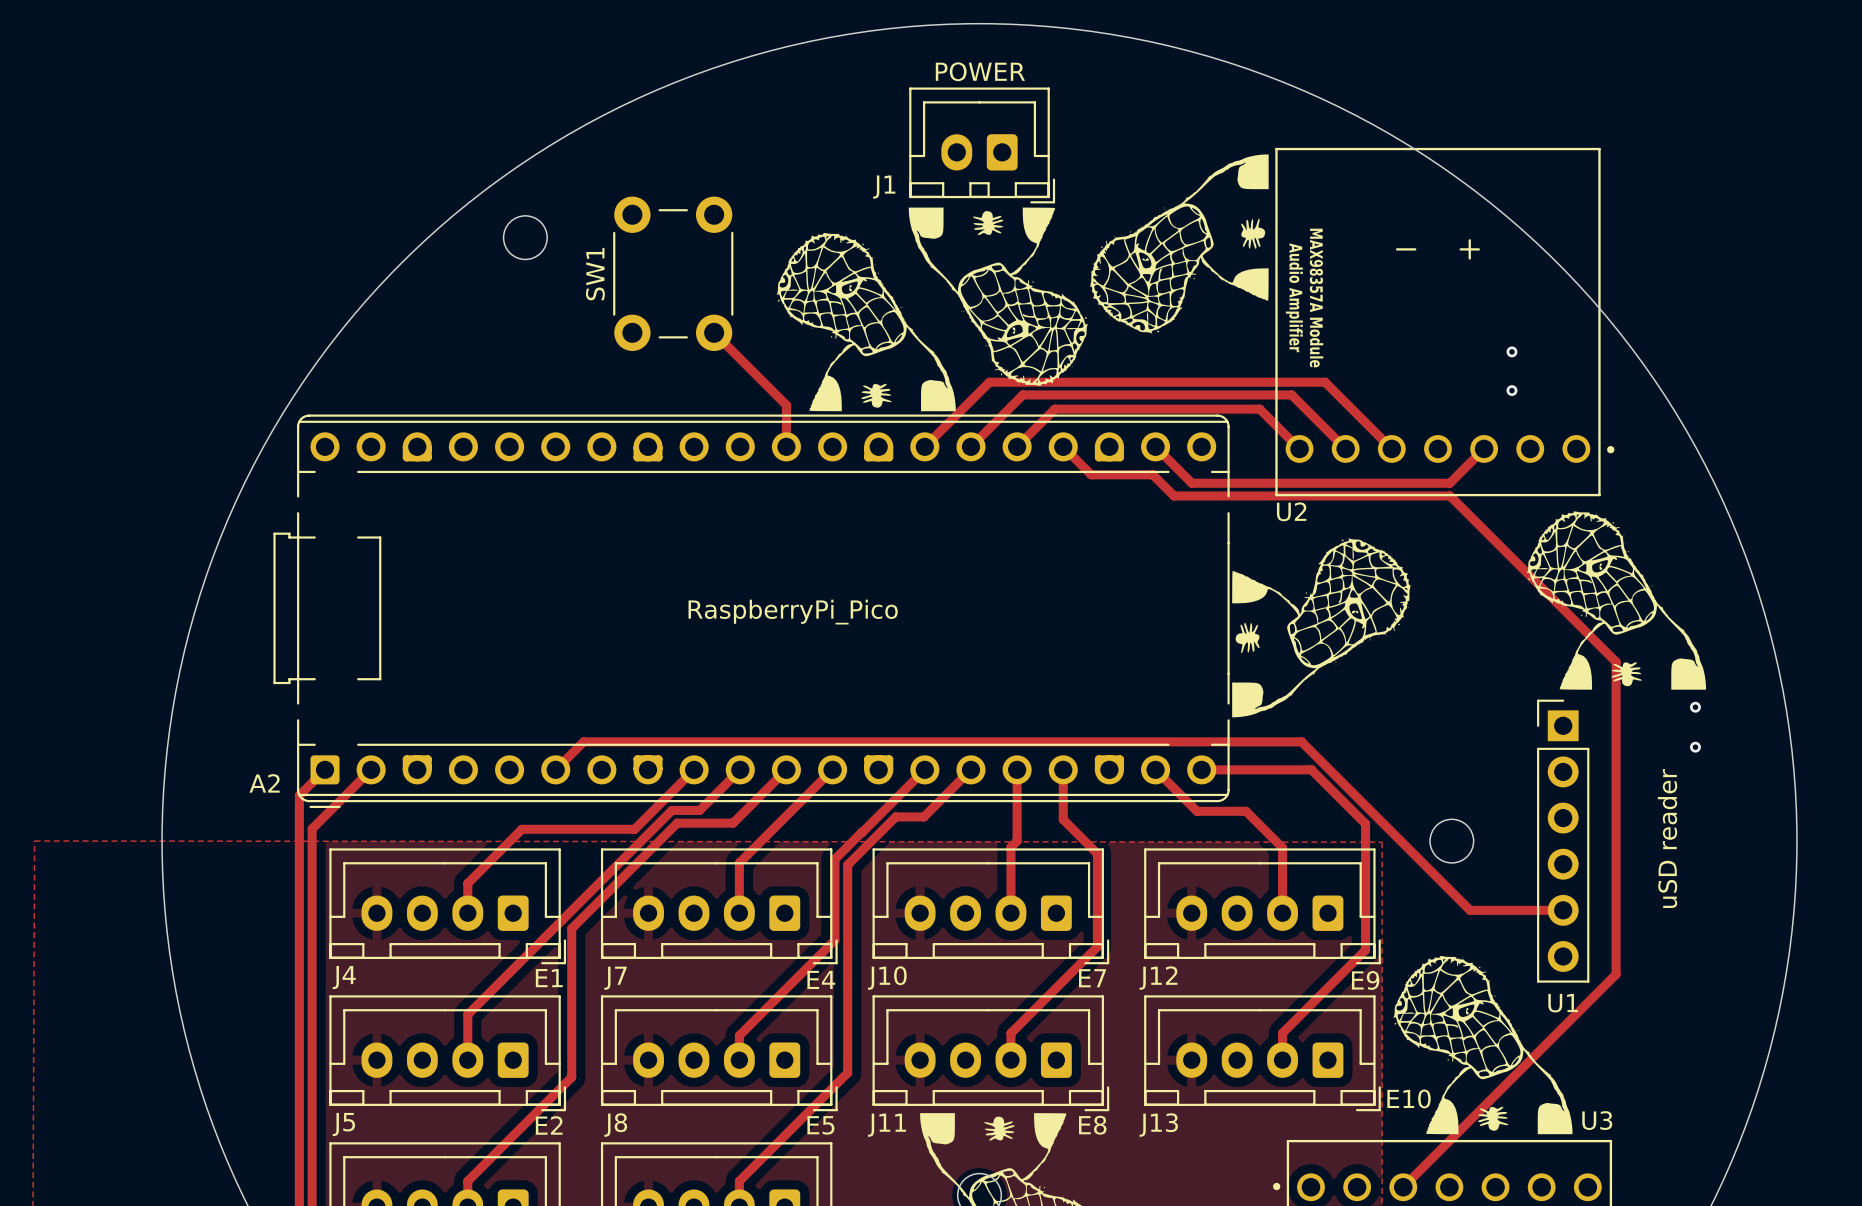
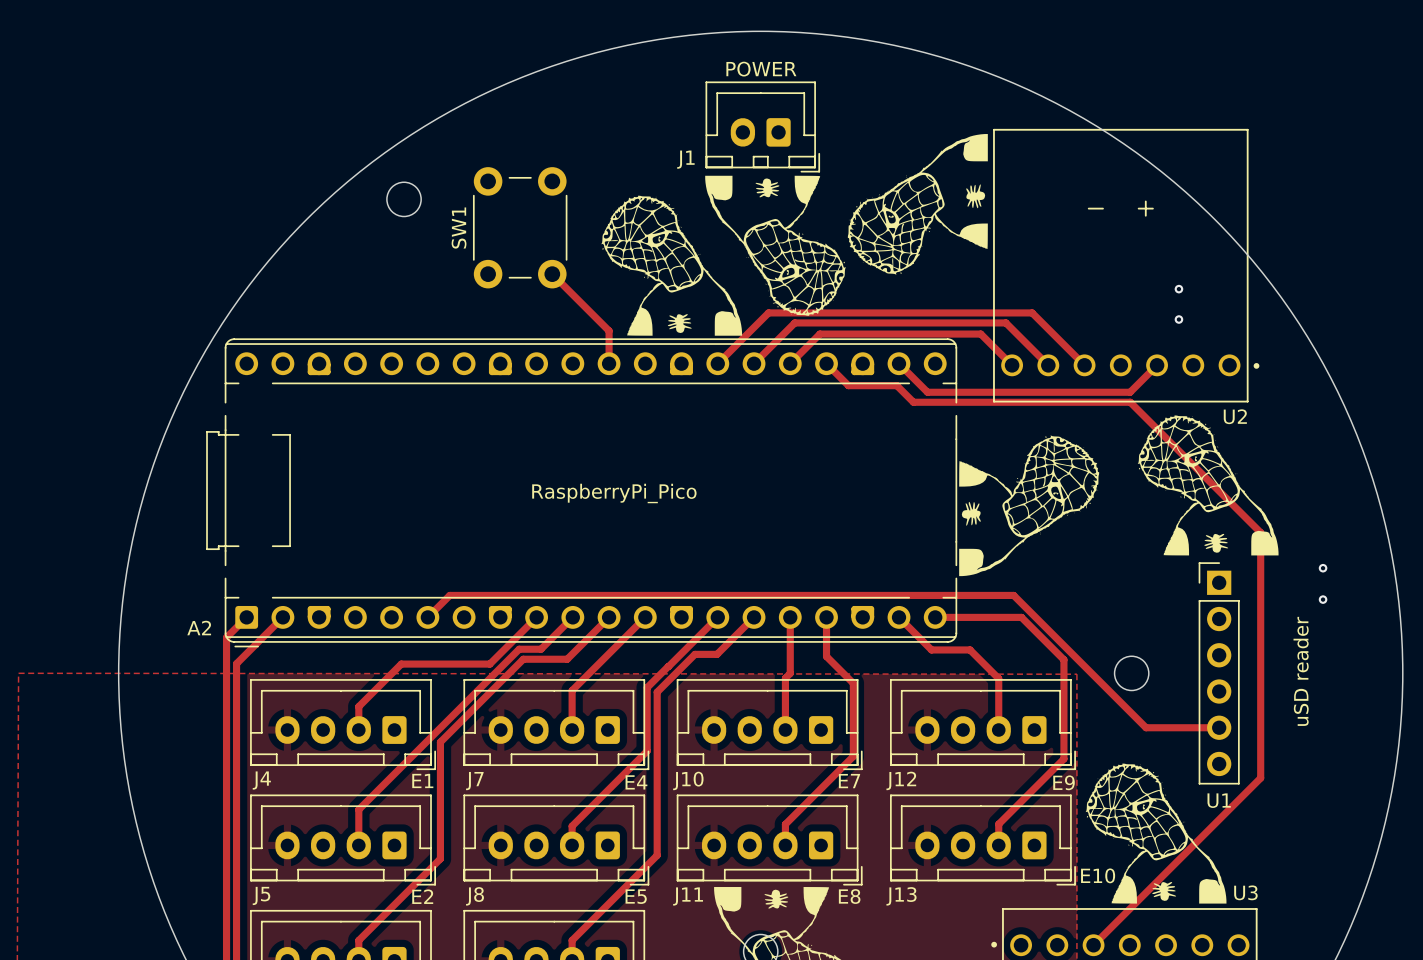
text: Audio Amplifier (1294, 297) -> none
text: MAX98357A Module (1316, 298) -> none
U2 name position: U2 (1291, 511) -> U2 (1235, 416)
drawing position: (1616, 600) -> (1208, 485)

